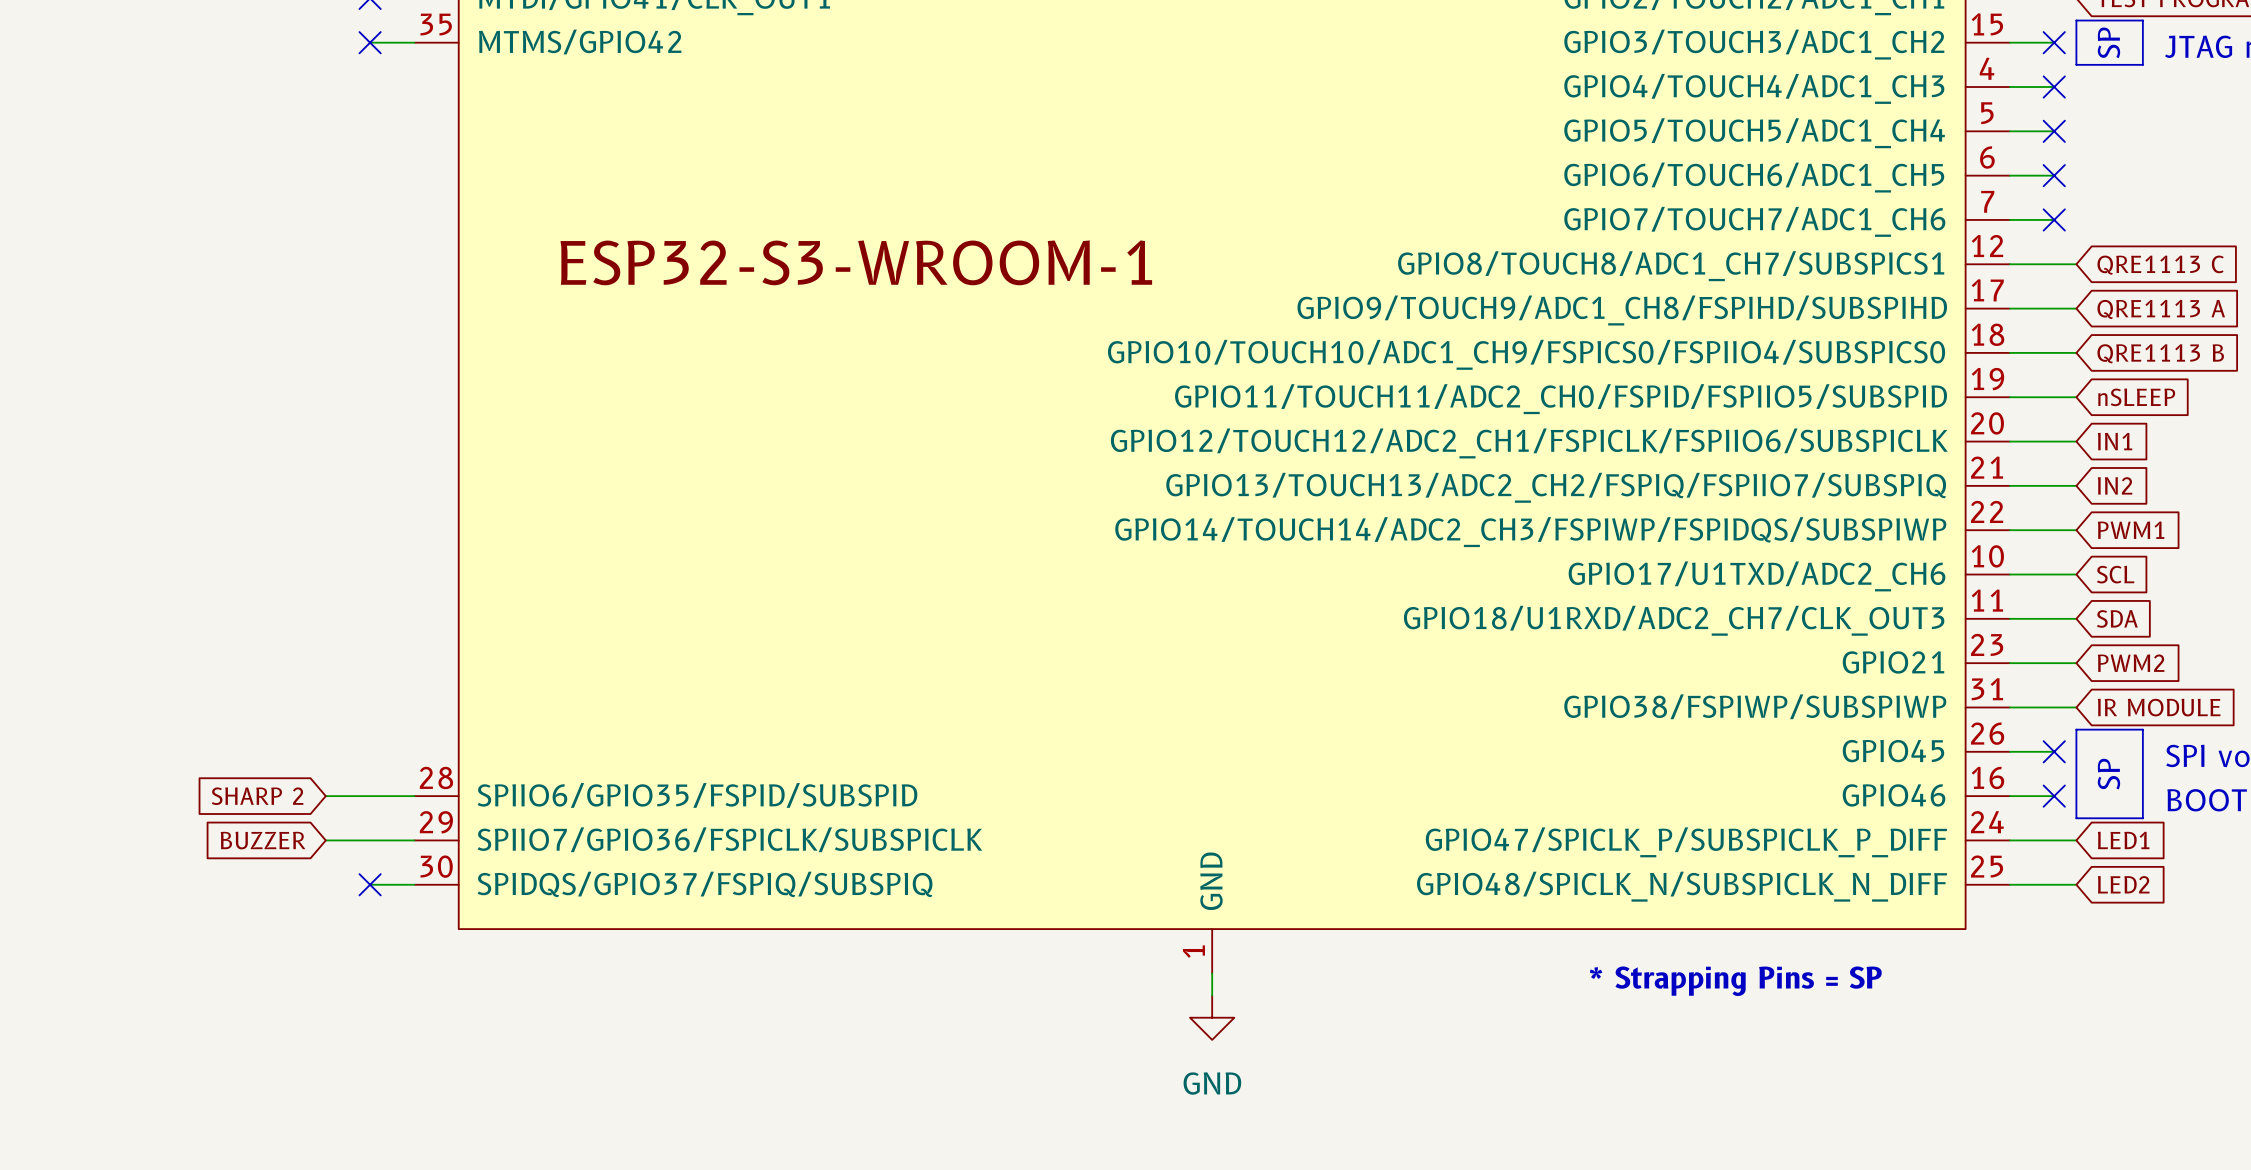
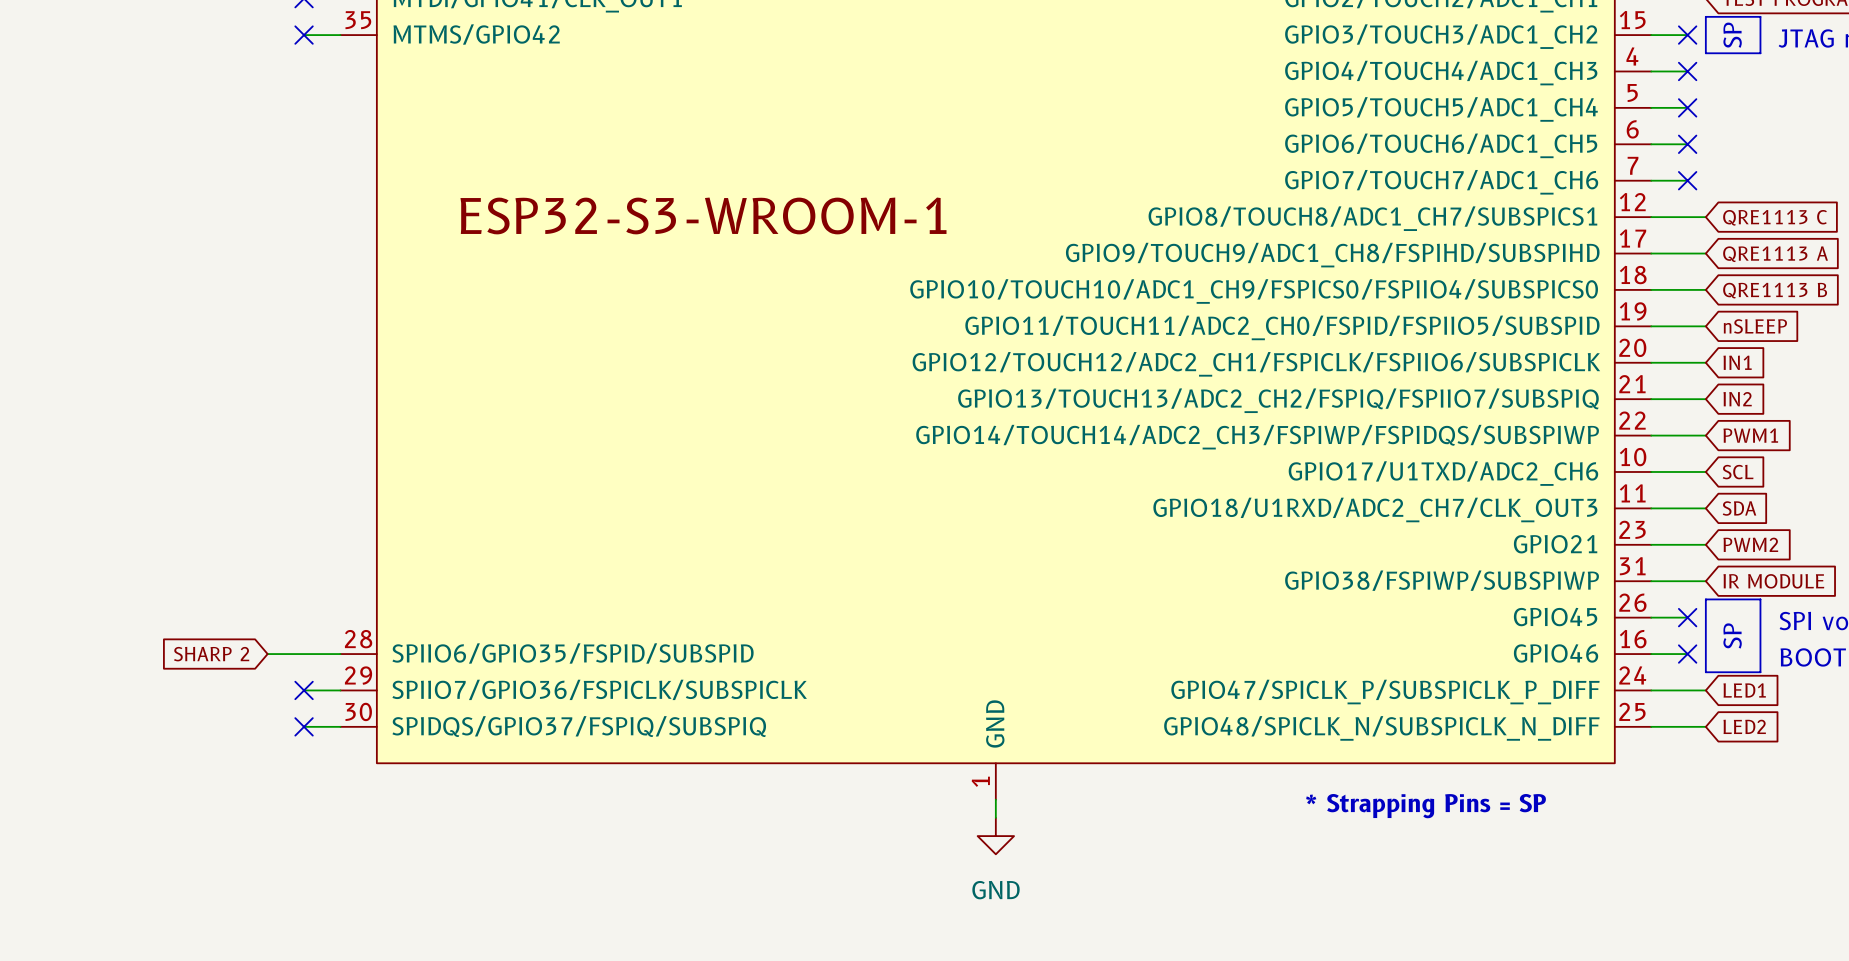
global label: BUZZER (263, 840) -> none
wire: (325, 840) (370, 840) -> none
no-connect mark: none -> (304, 690)

